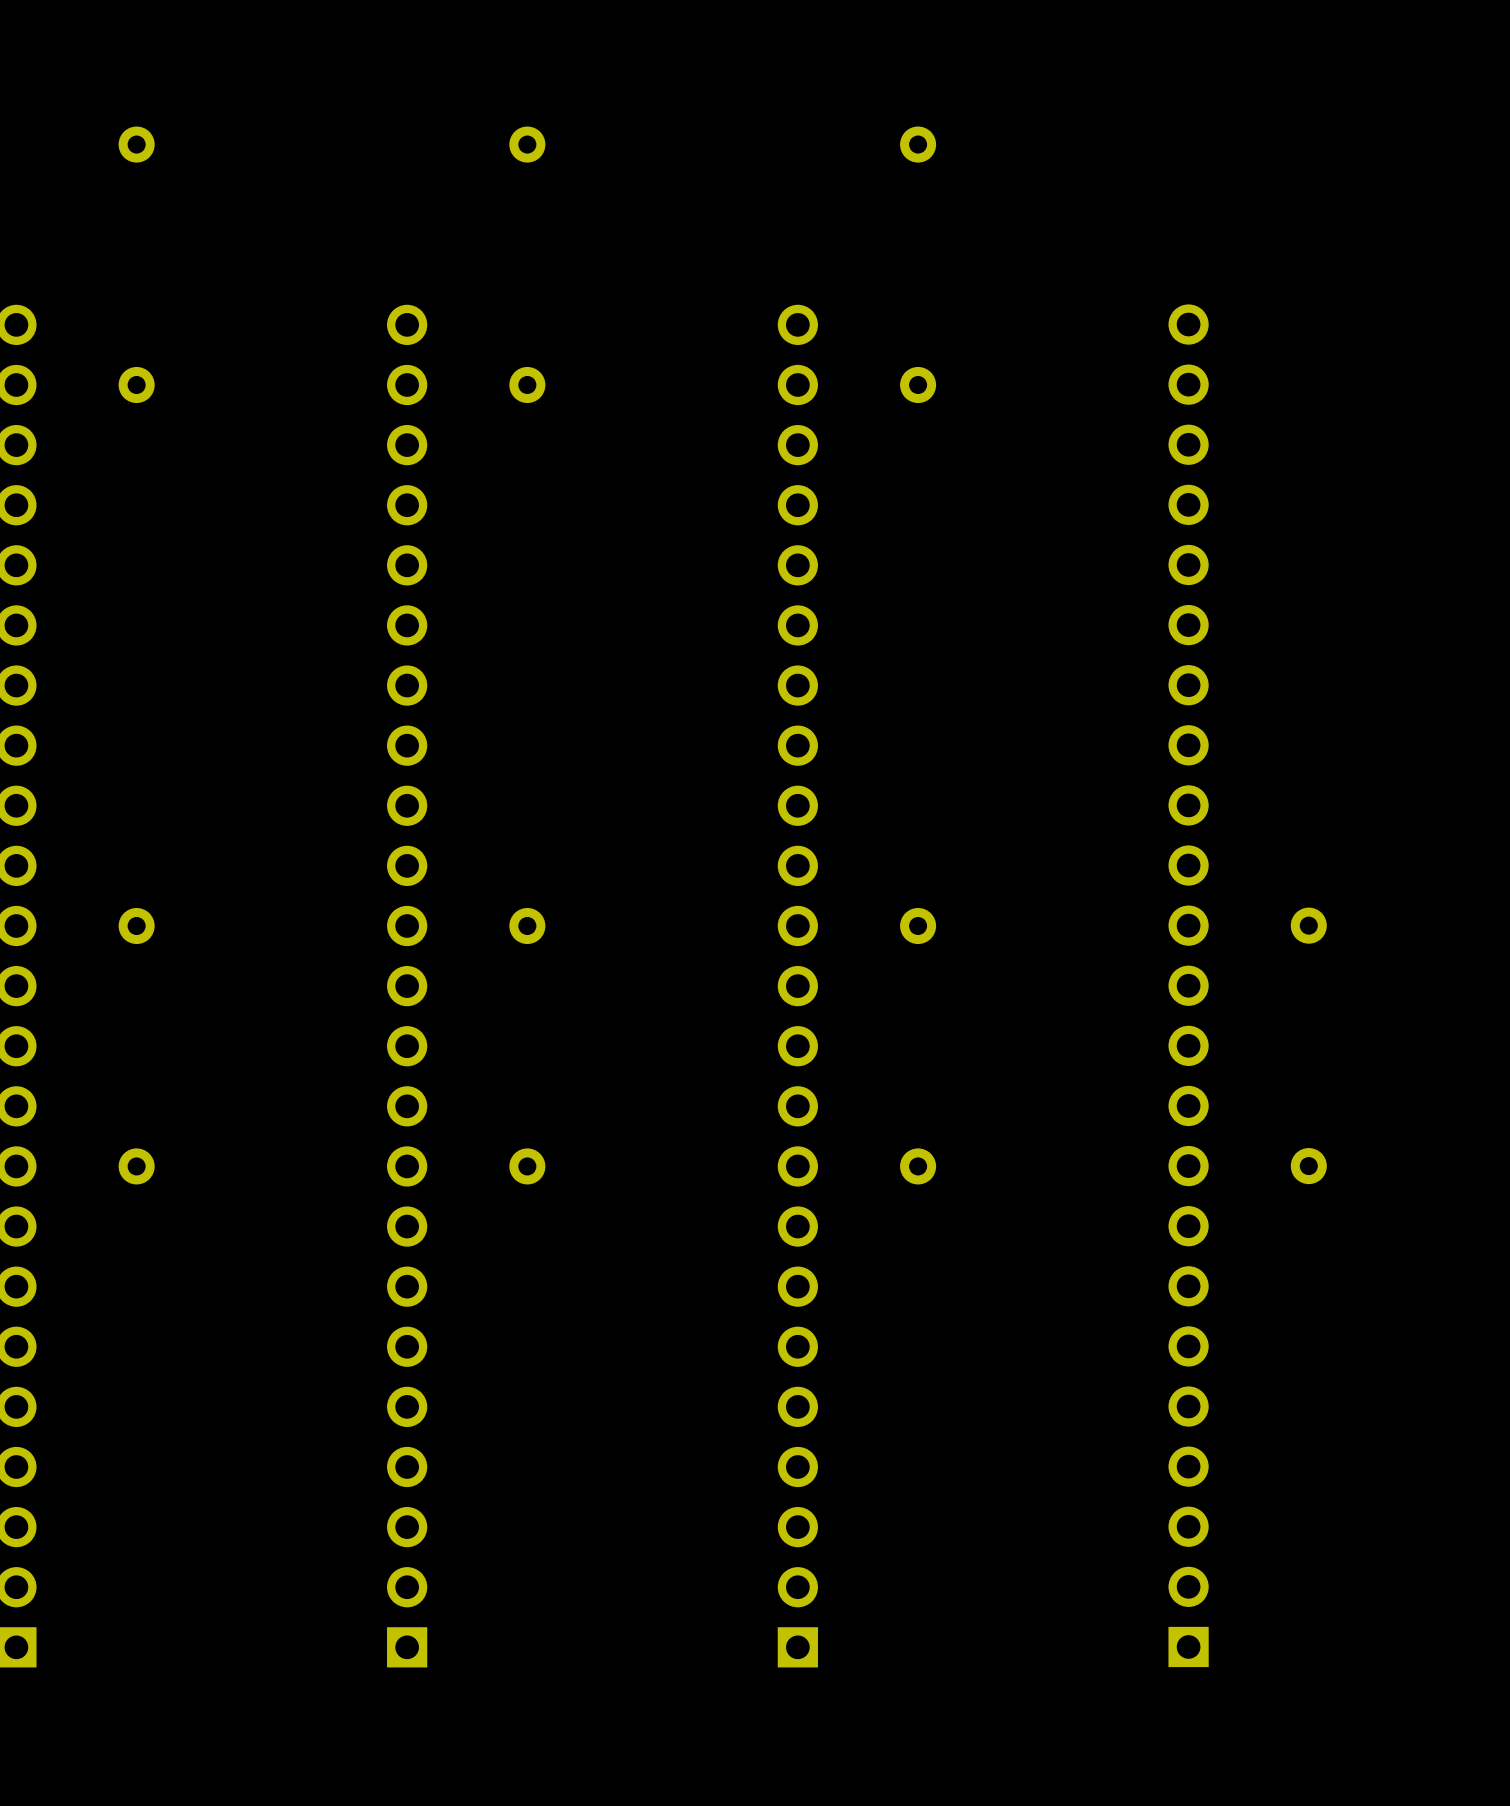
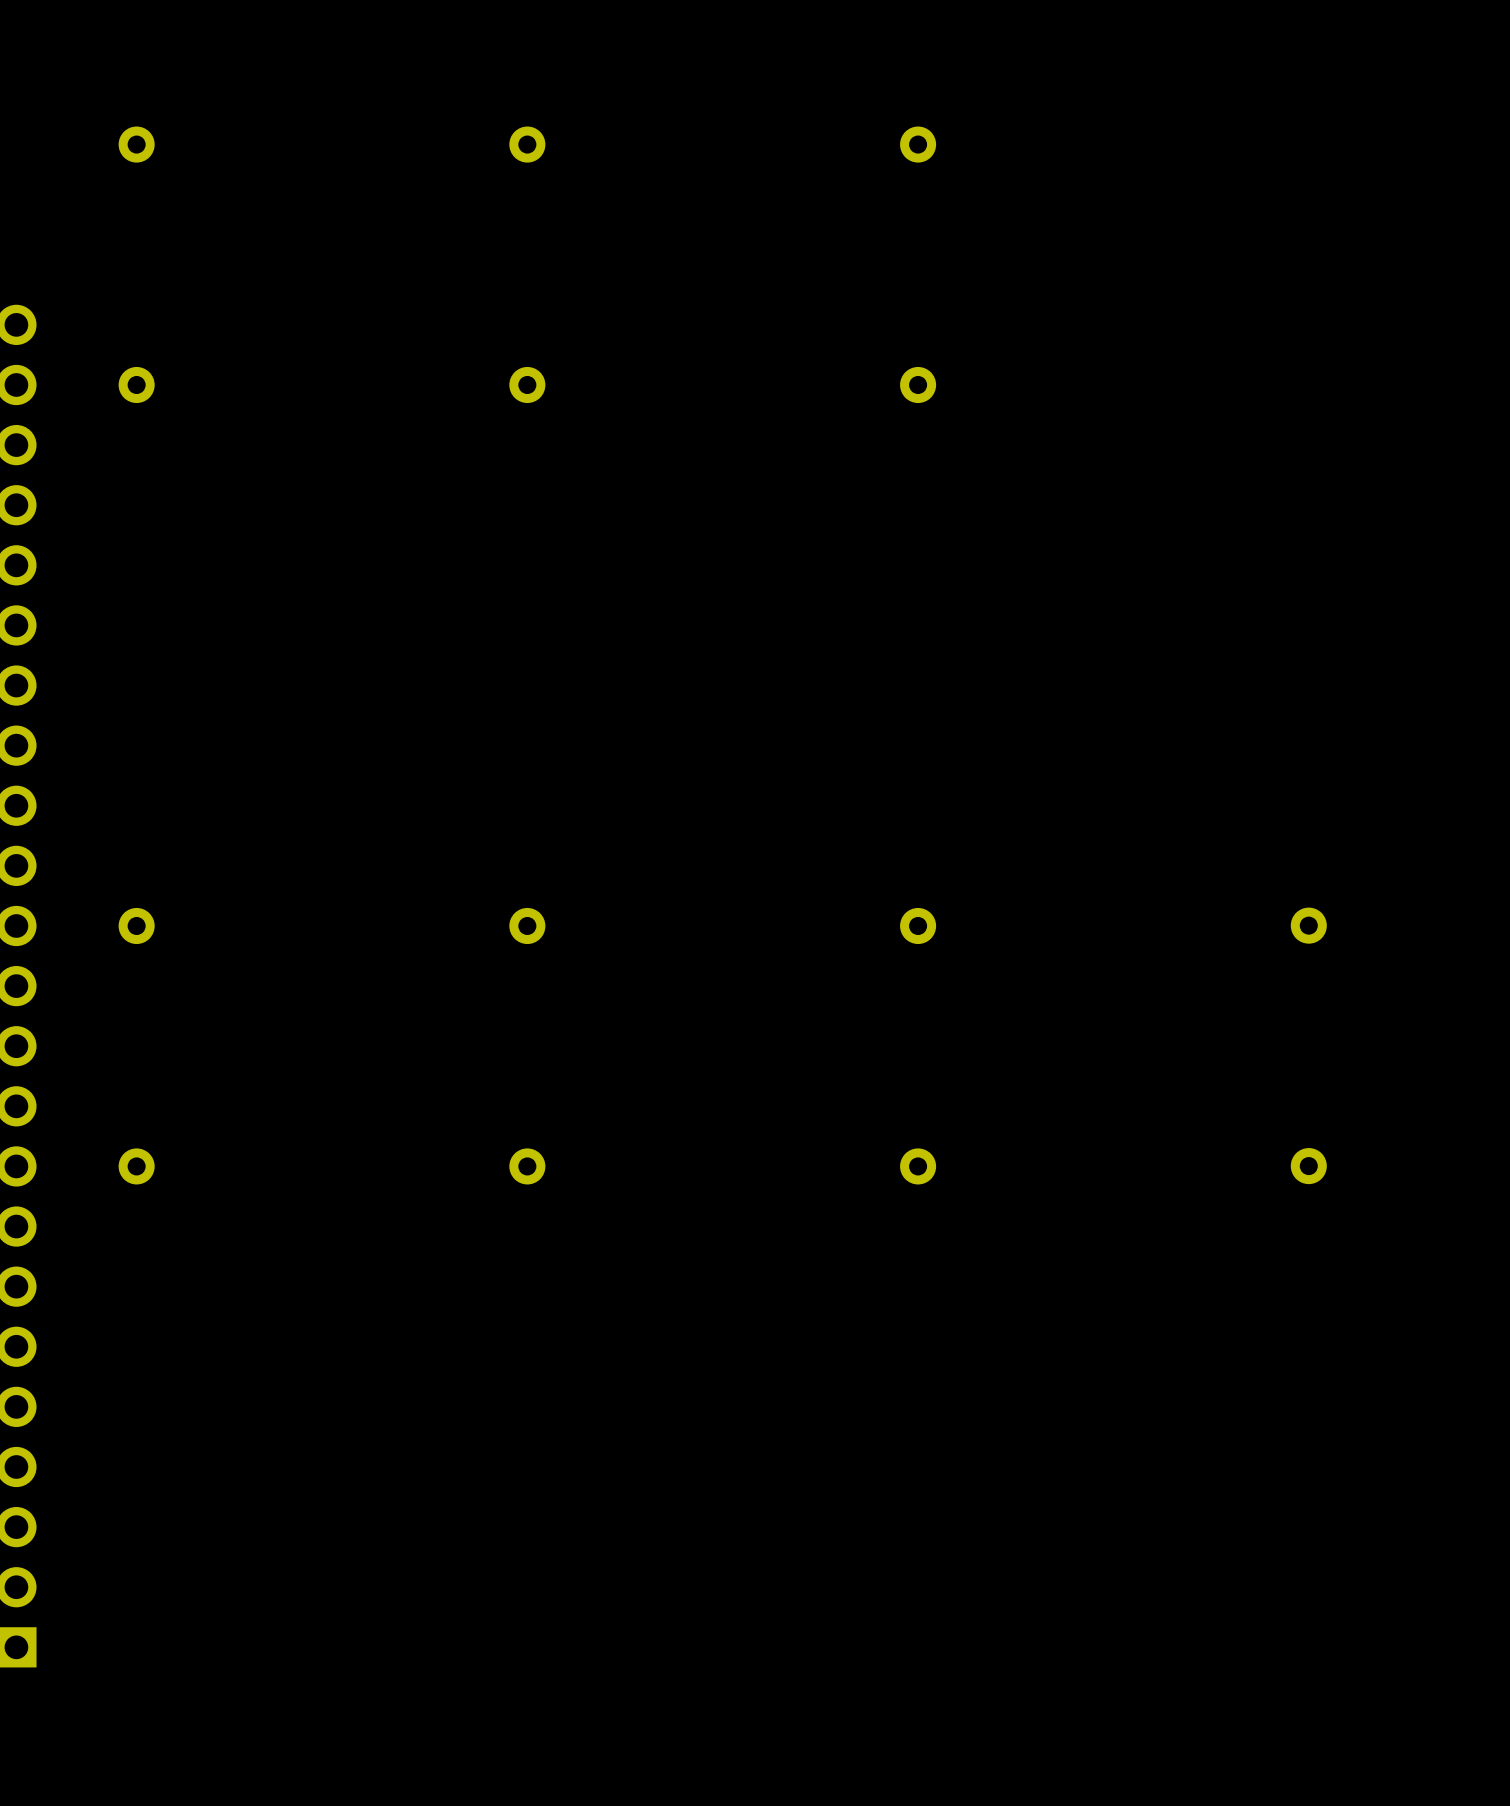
part: (1188, 985) -> none
part: (407, 986) -> none
part: (797, 986) -> none

